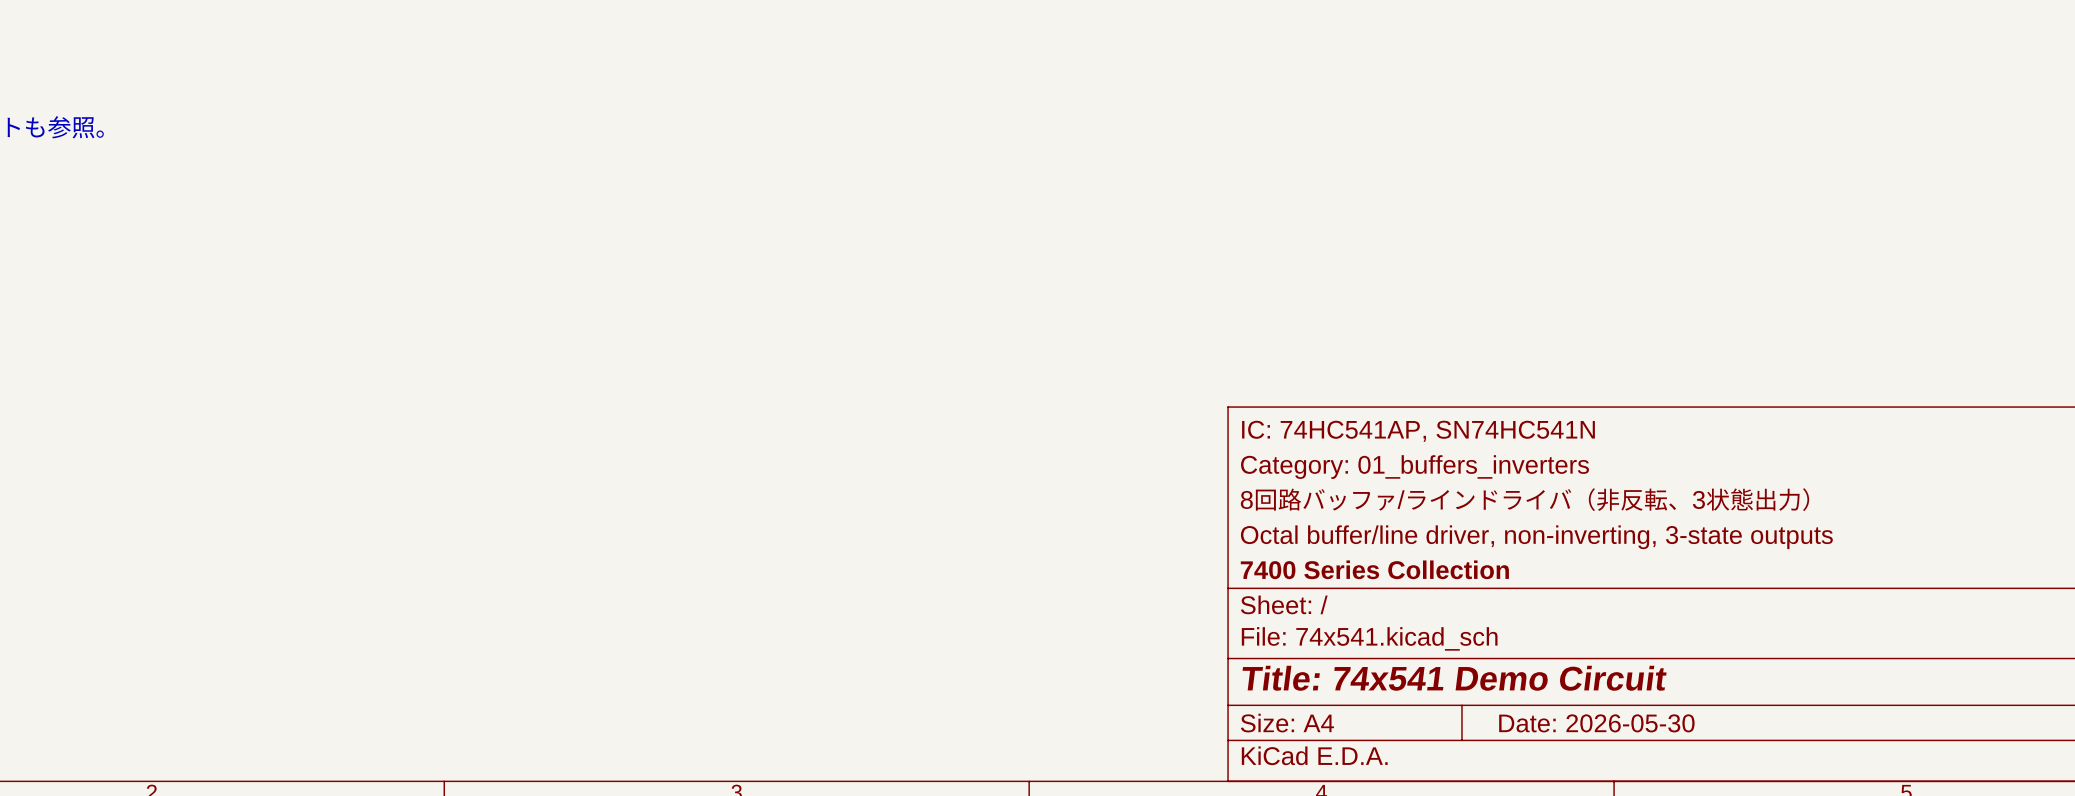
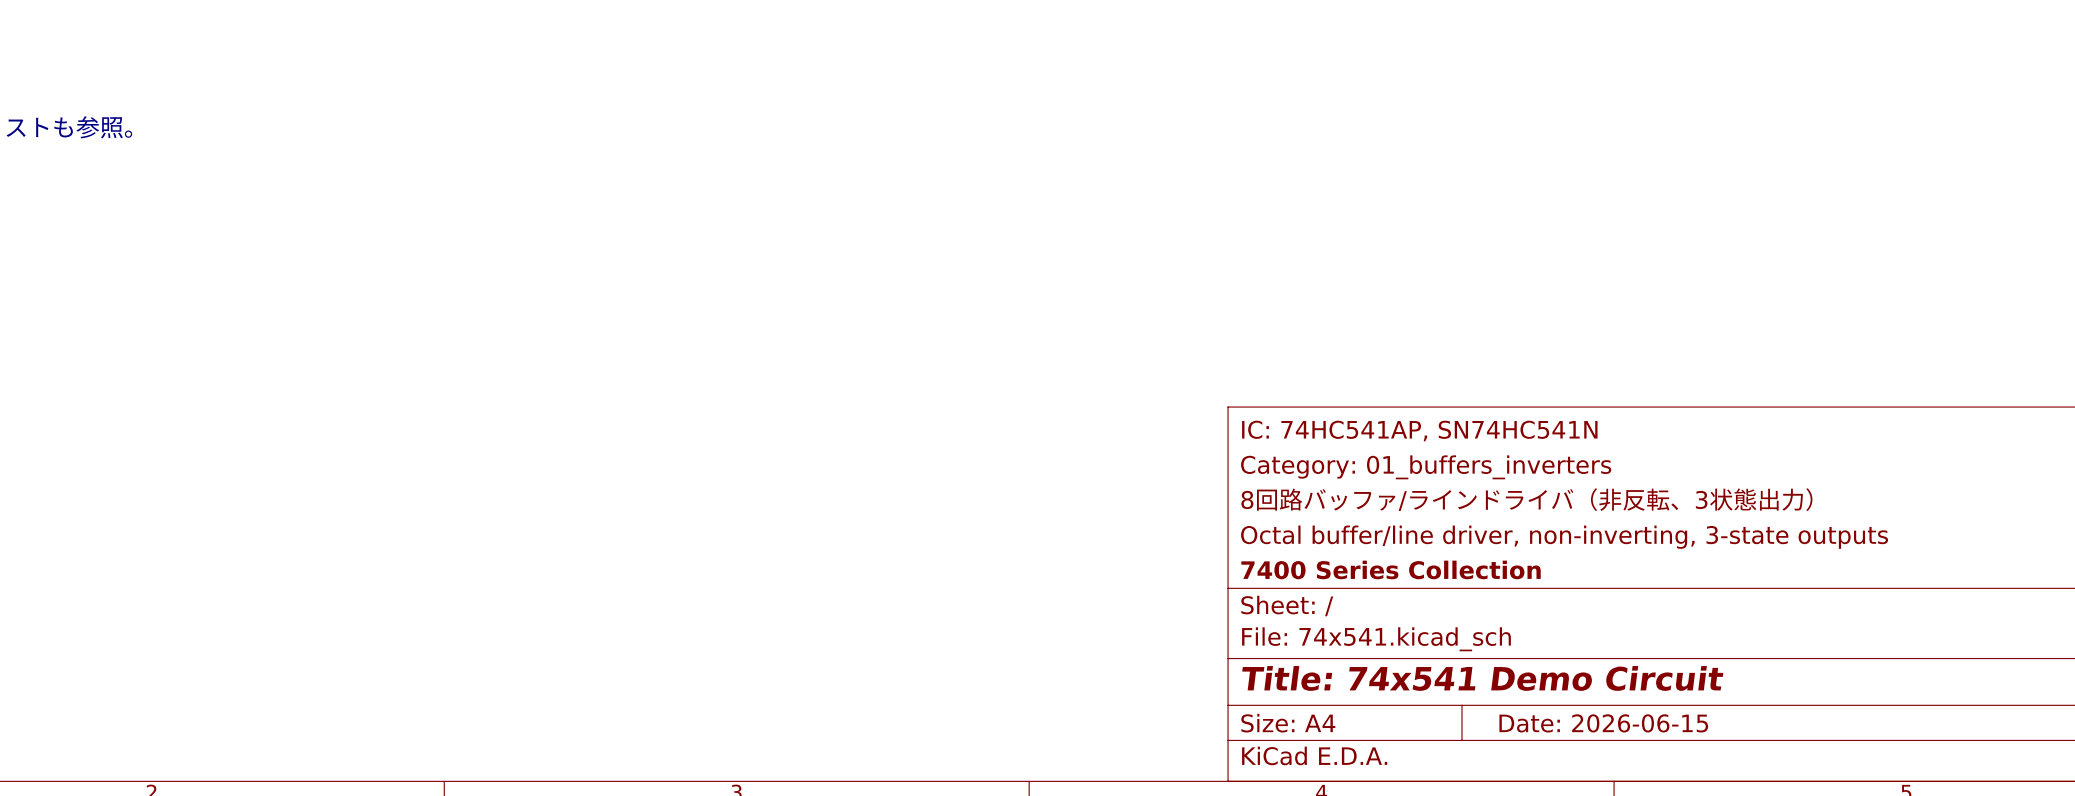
title block: Date: 2026-05-30 (1596, 723) -> Date: 2026-06-15 (1603, 723)

